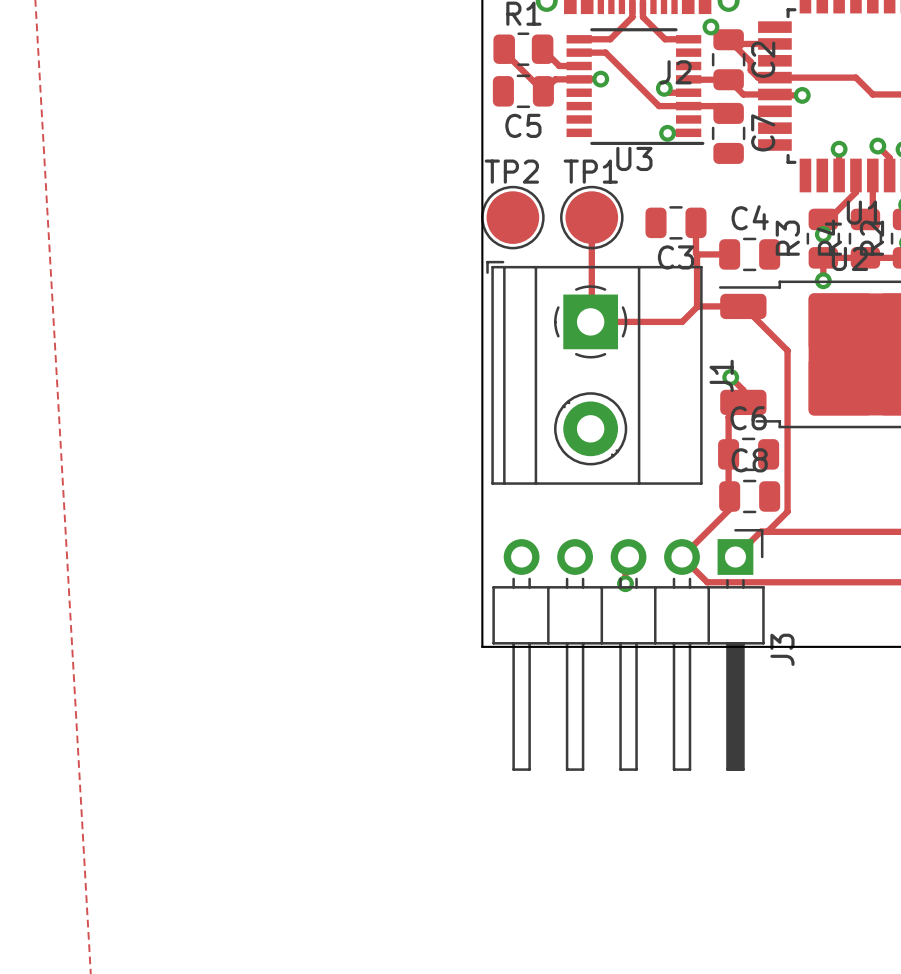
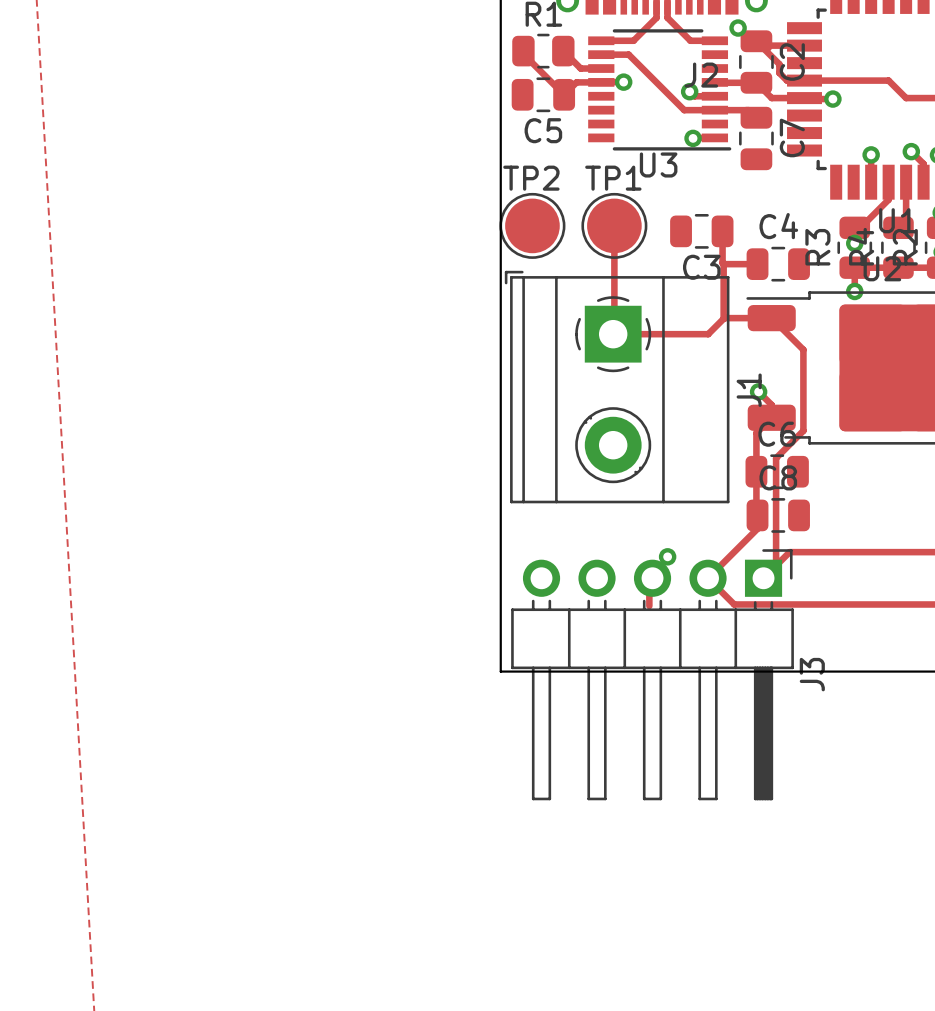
track: (773, 336) (787, 350) (787, 511) (767, 531) -> (803, 349) (803, 430) (776, 458) (776, 565)
via position: (625, 583) -> (667, 556)

